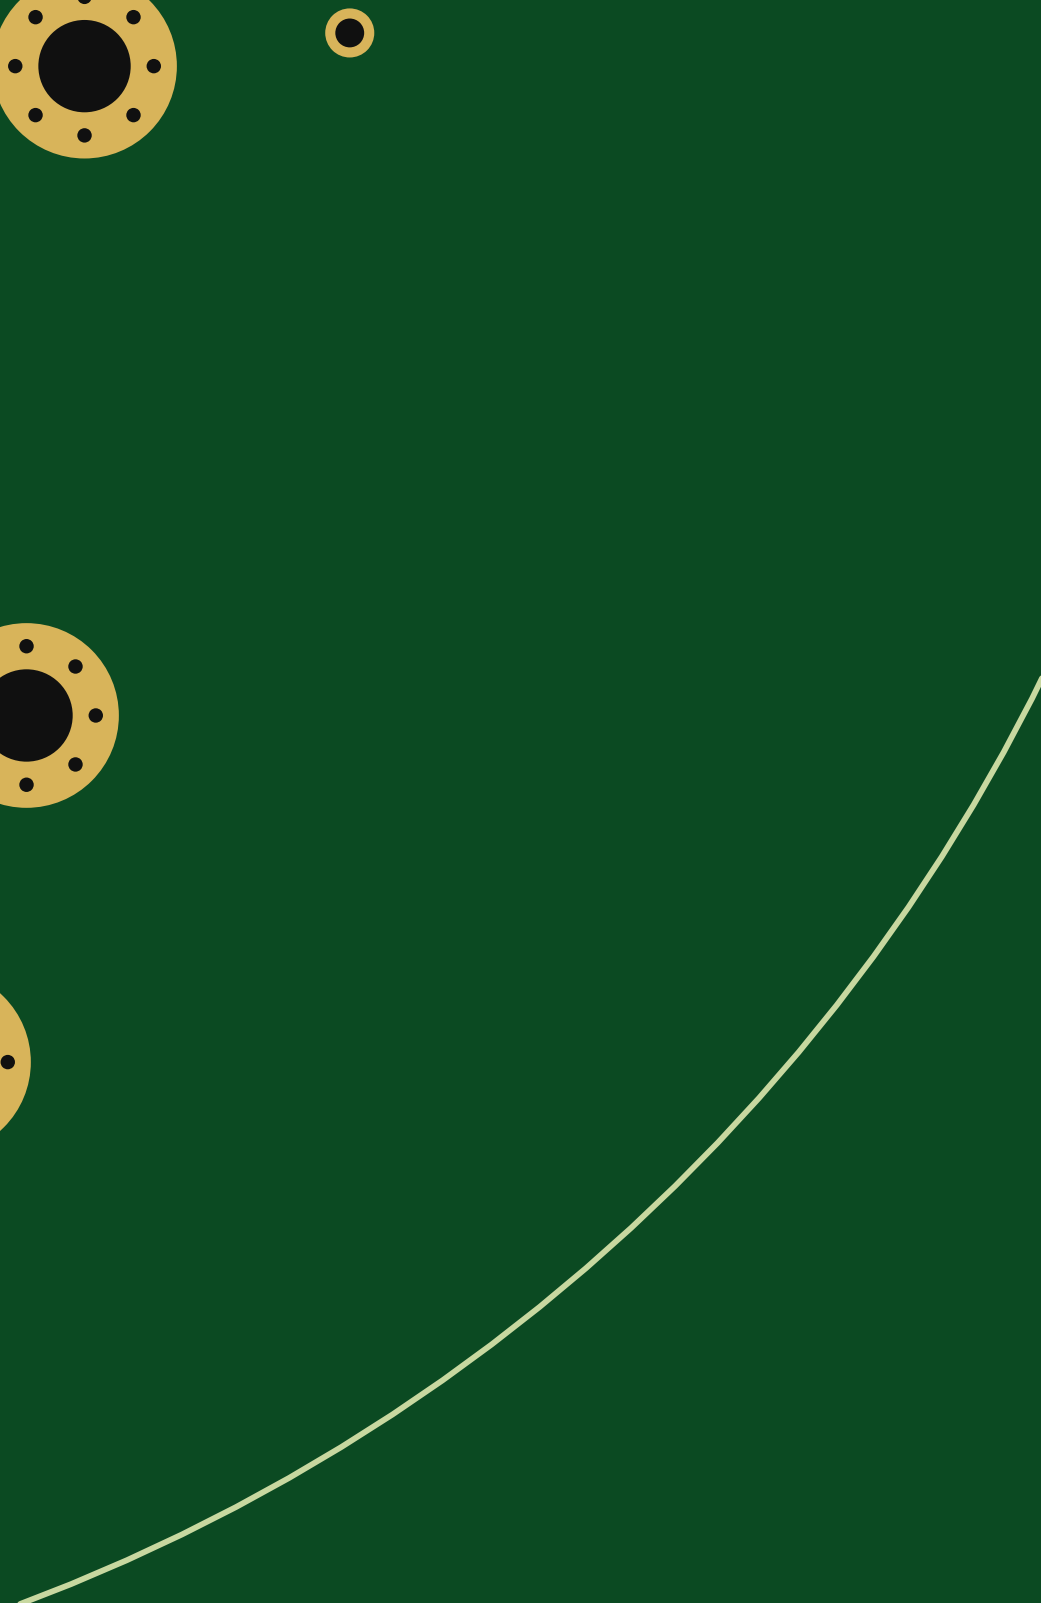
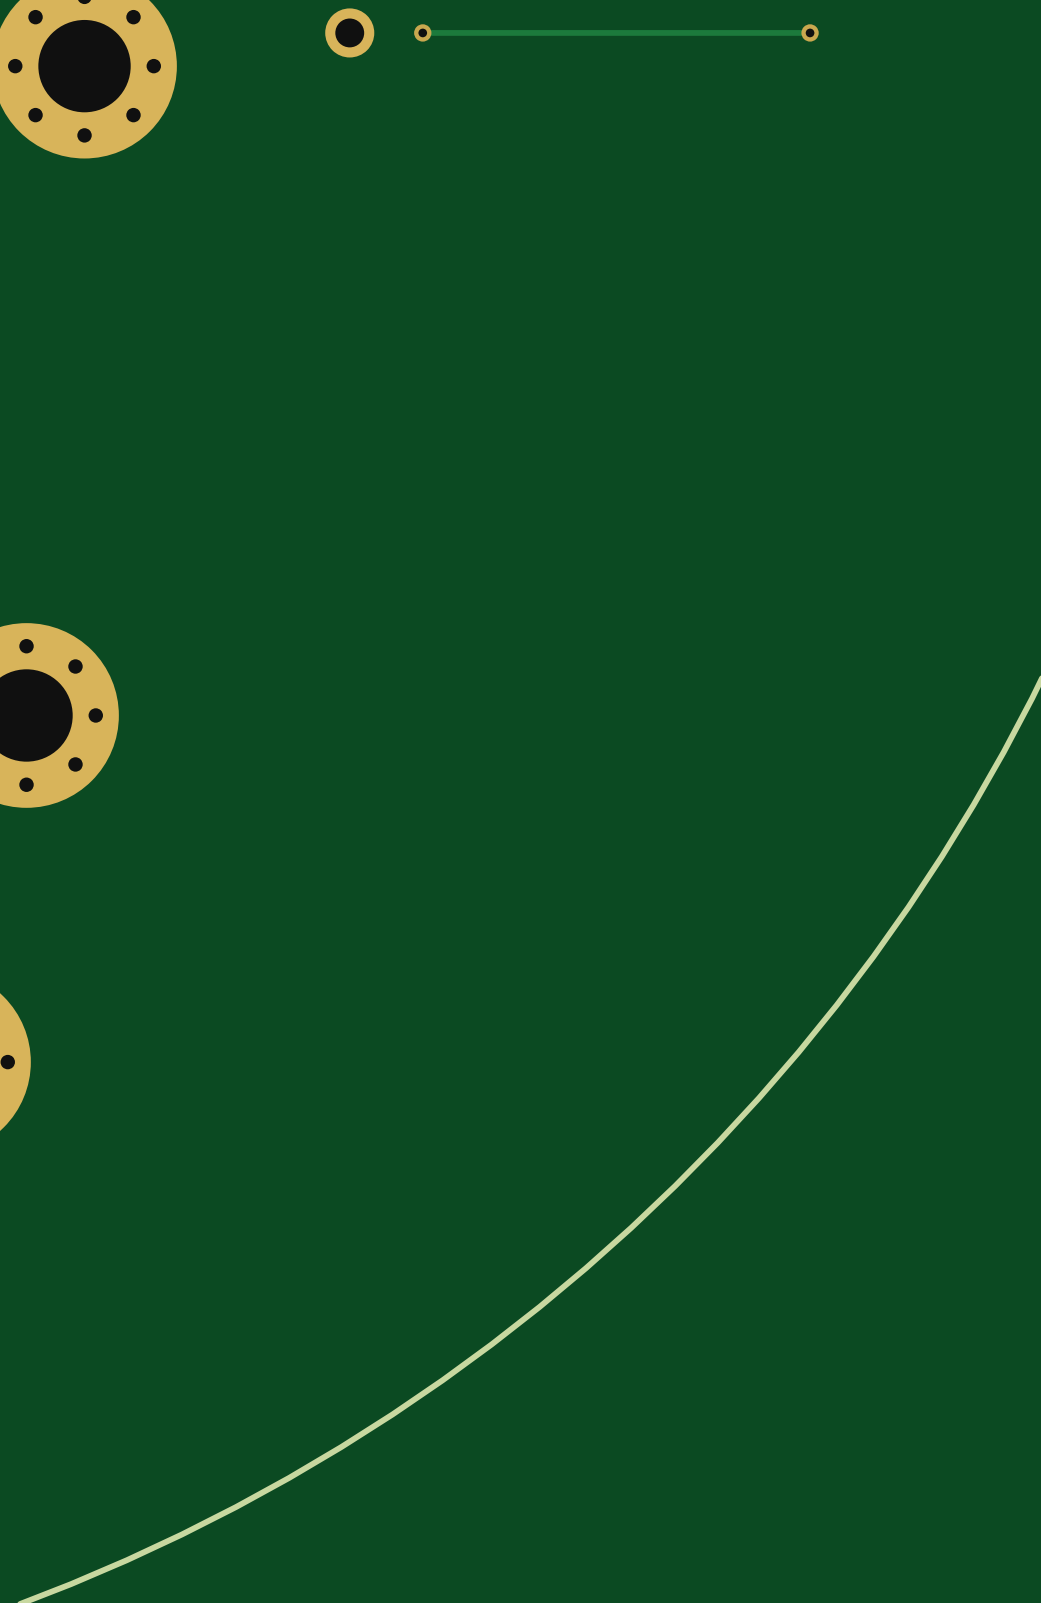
via: none -> (422, 32)
track: none -> (810, 32) (422, 32)
via: none -> (810, 32)

